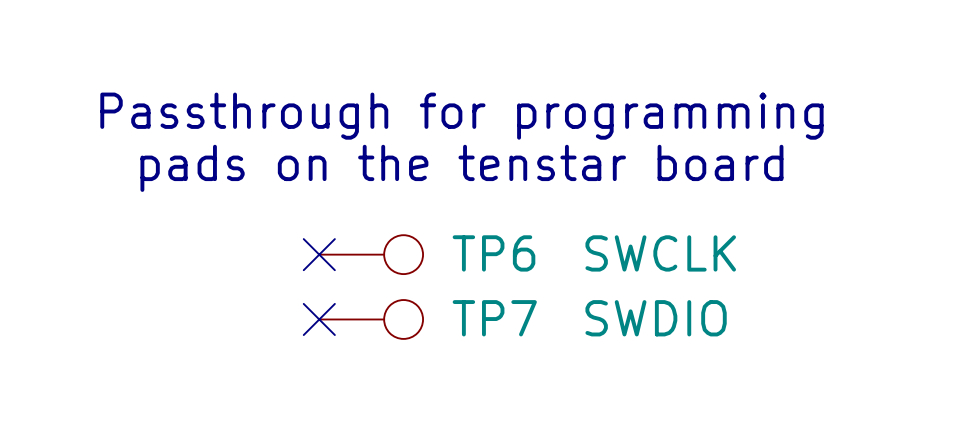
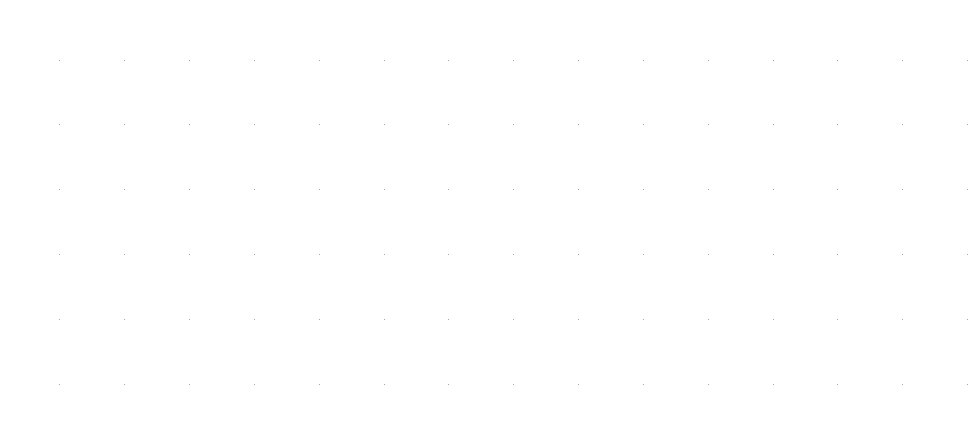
text: Passthrough for programming (461, 116) -> none
text: pads on the tenstar board (461, 168) -> none
no-connect mark: (319, 254) -> none
TP6: SWCLK (371, 254) -> none
no-connect mark: (319, 319) -> none
TP7: SWDIO (371, 319) -> none

